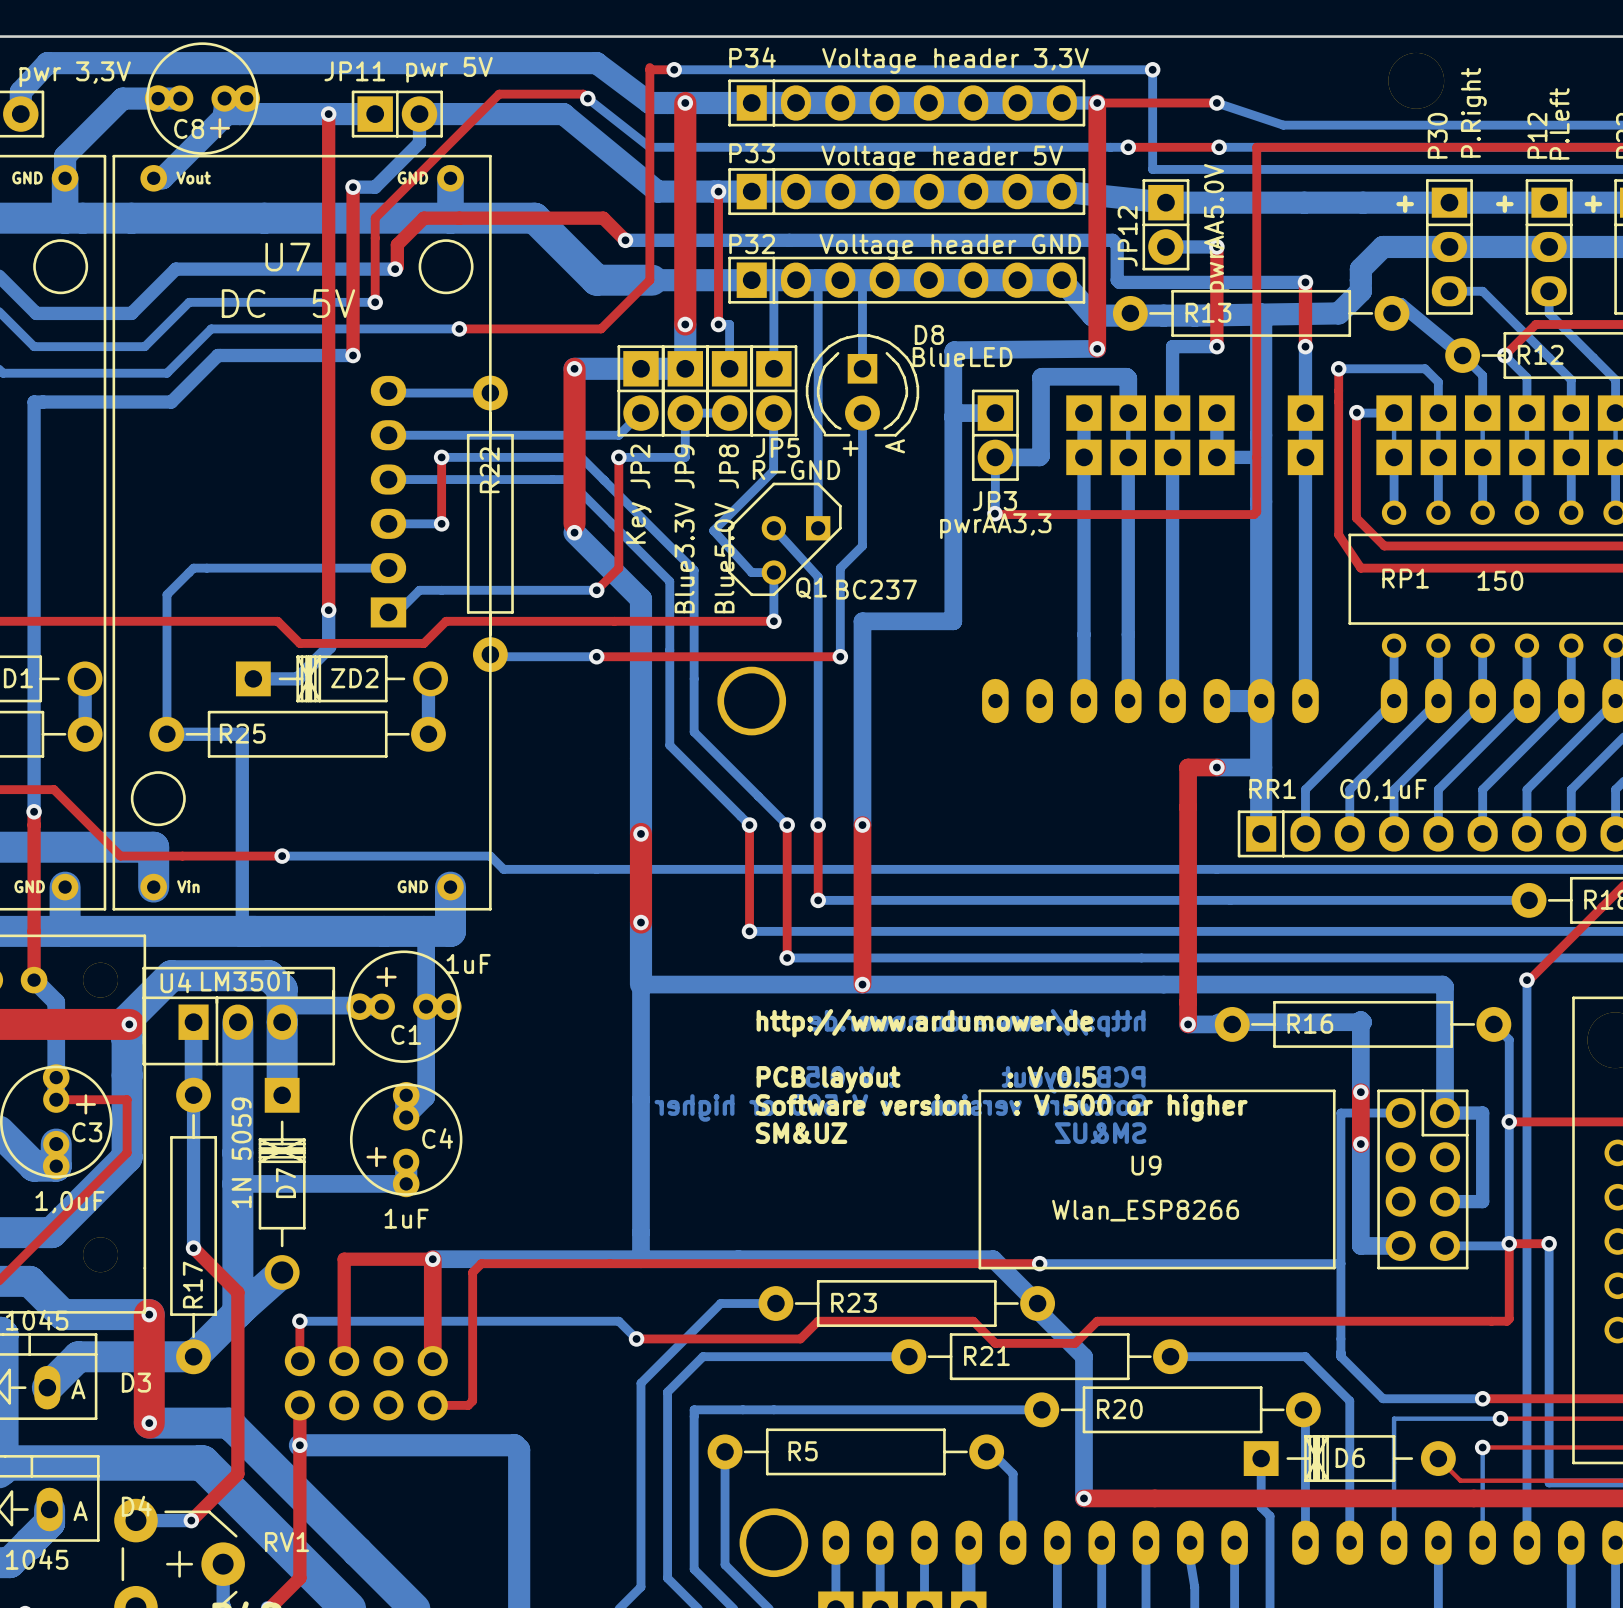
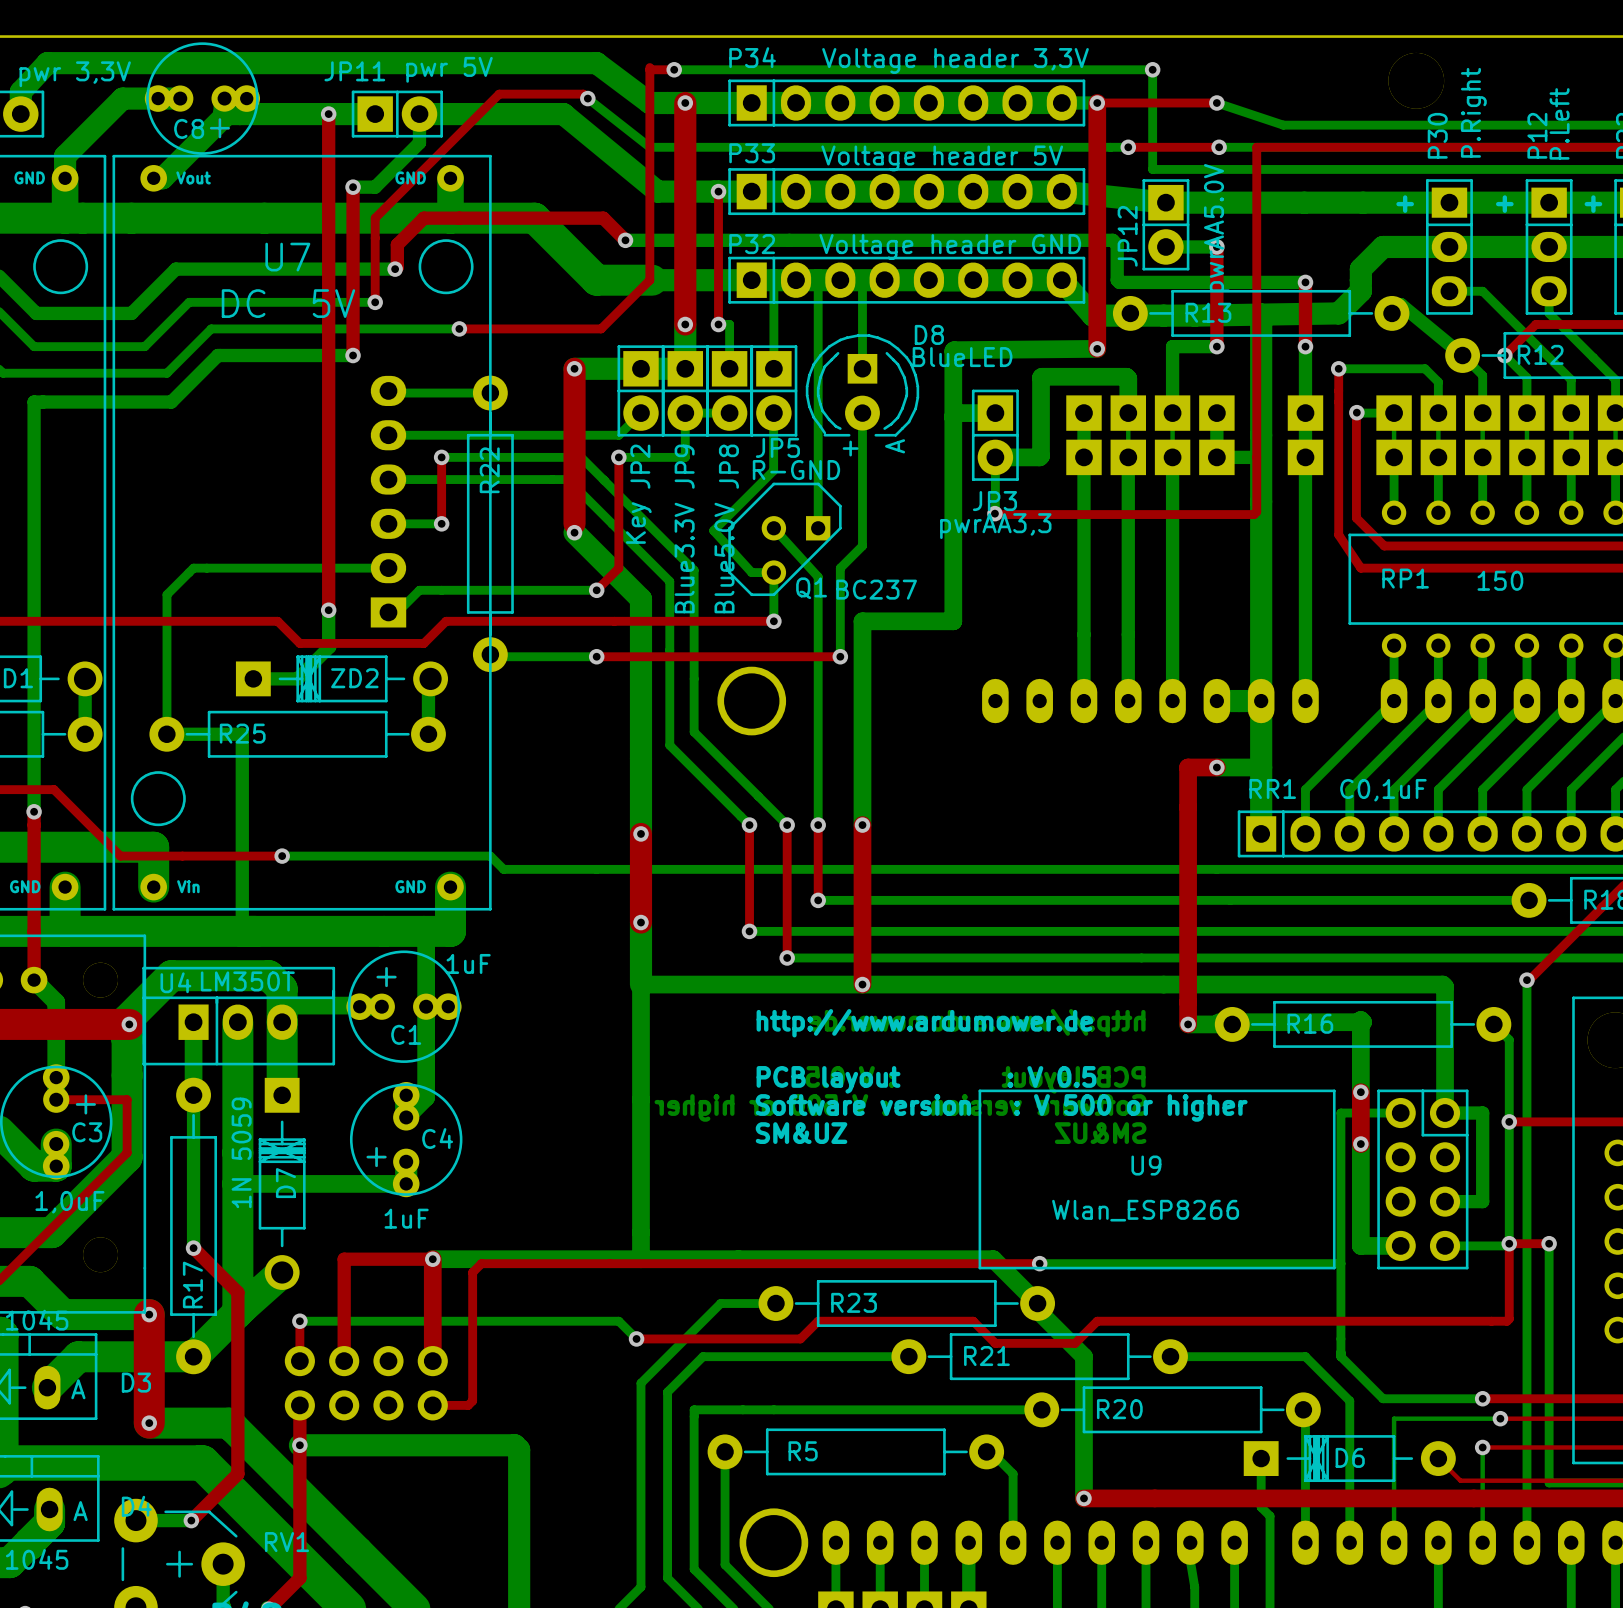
part text position: GND (27, 177) -> GND (25, 886)
U7 text position: GND (412, 177) -> GND (410, 886)
part text position: GND (29, 886) -> GND (29, 177)
U7 text position: GND (412, 886) -> GND (410, 177)

